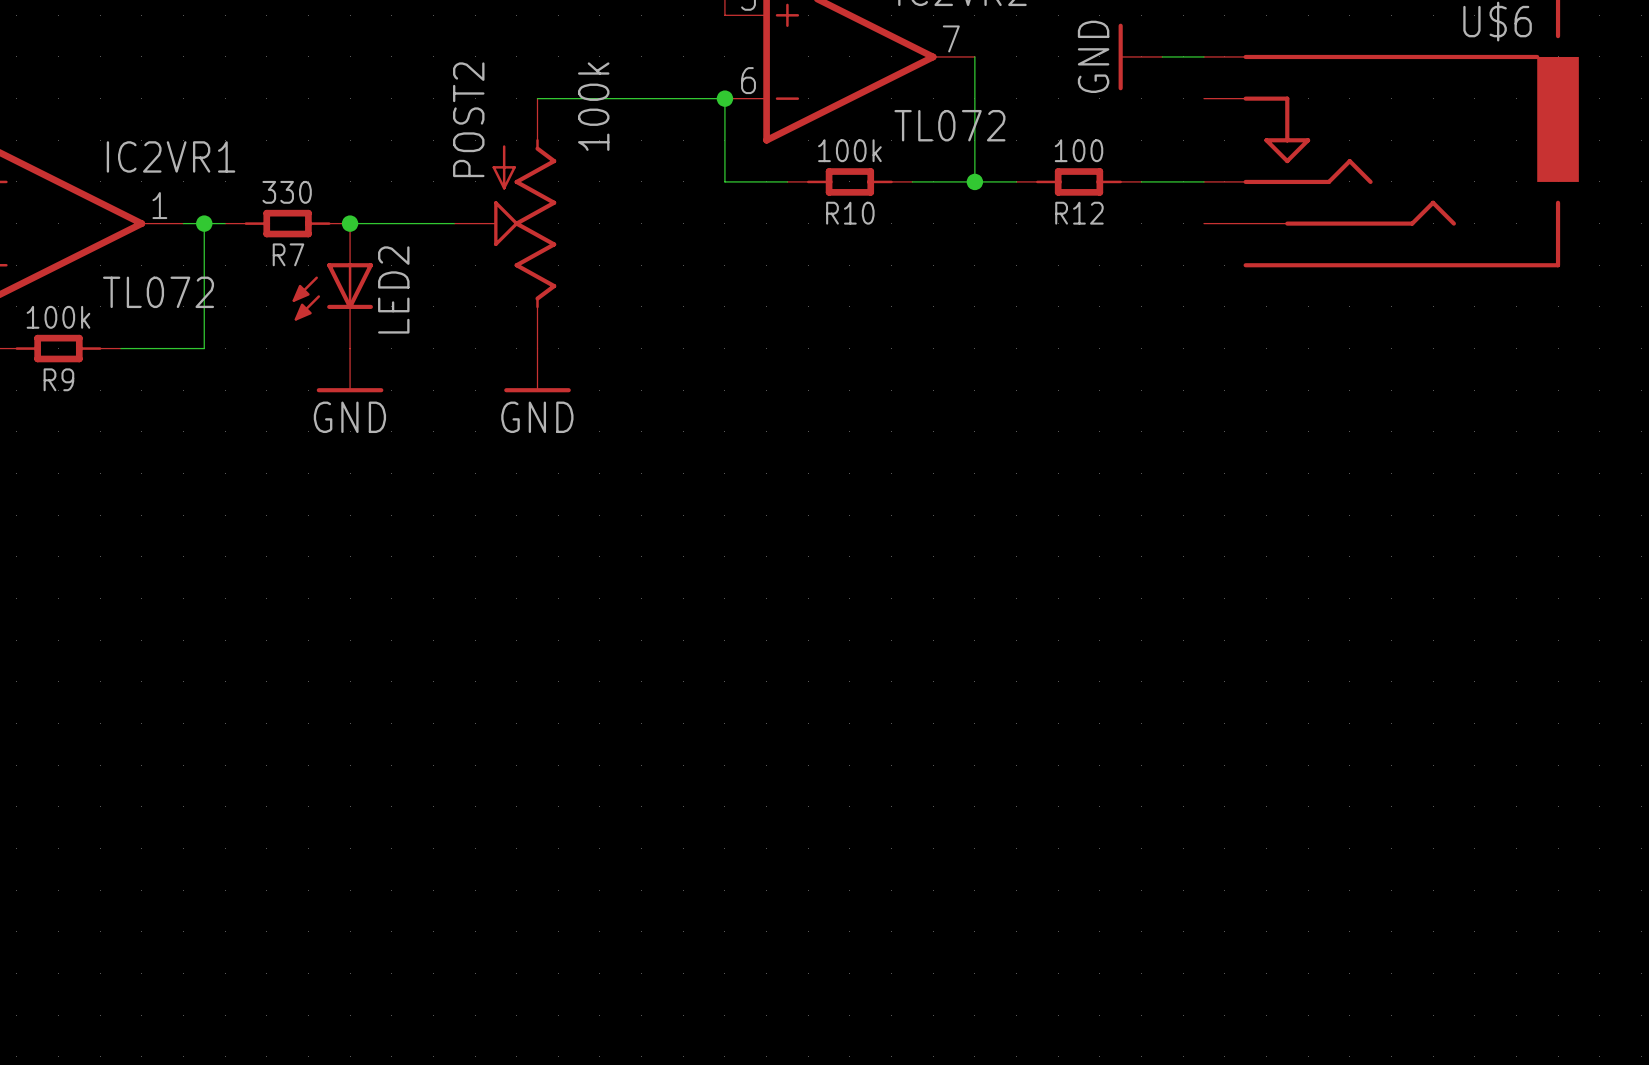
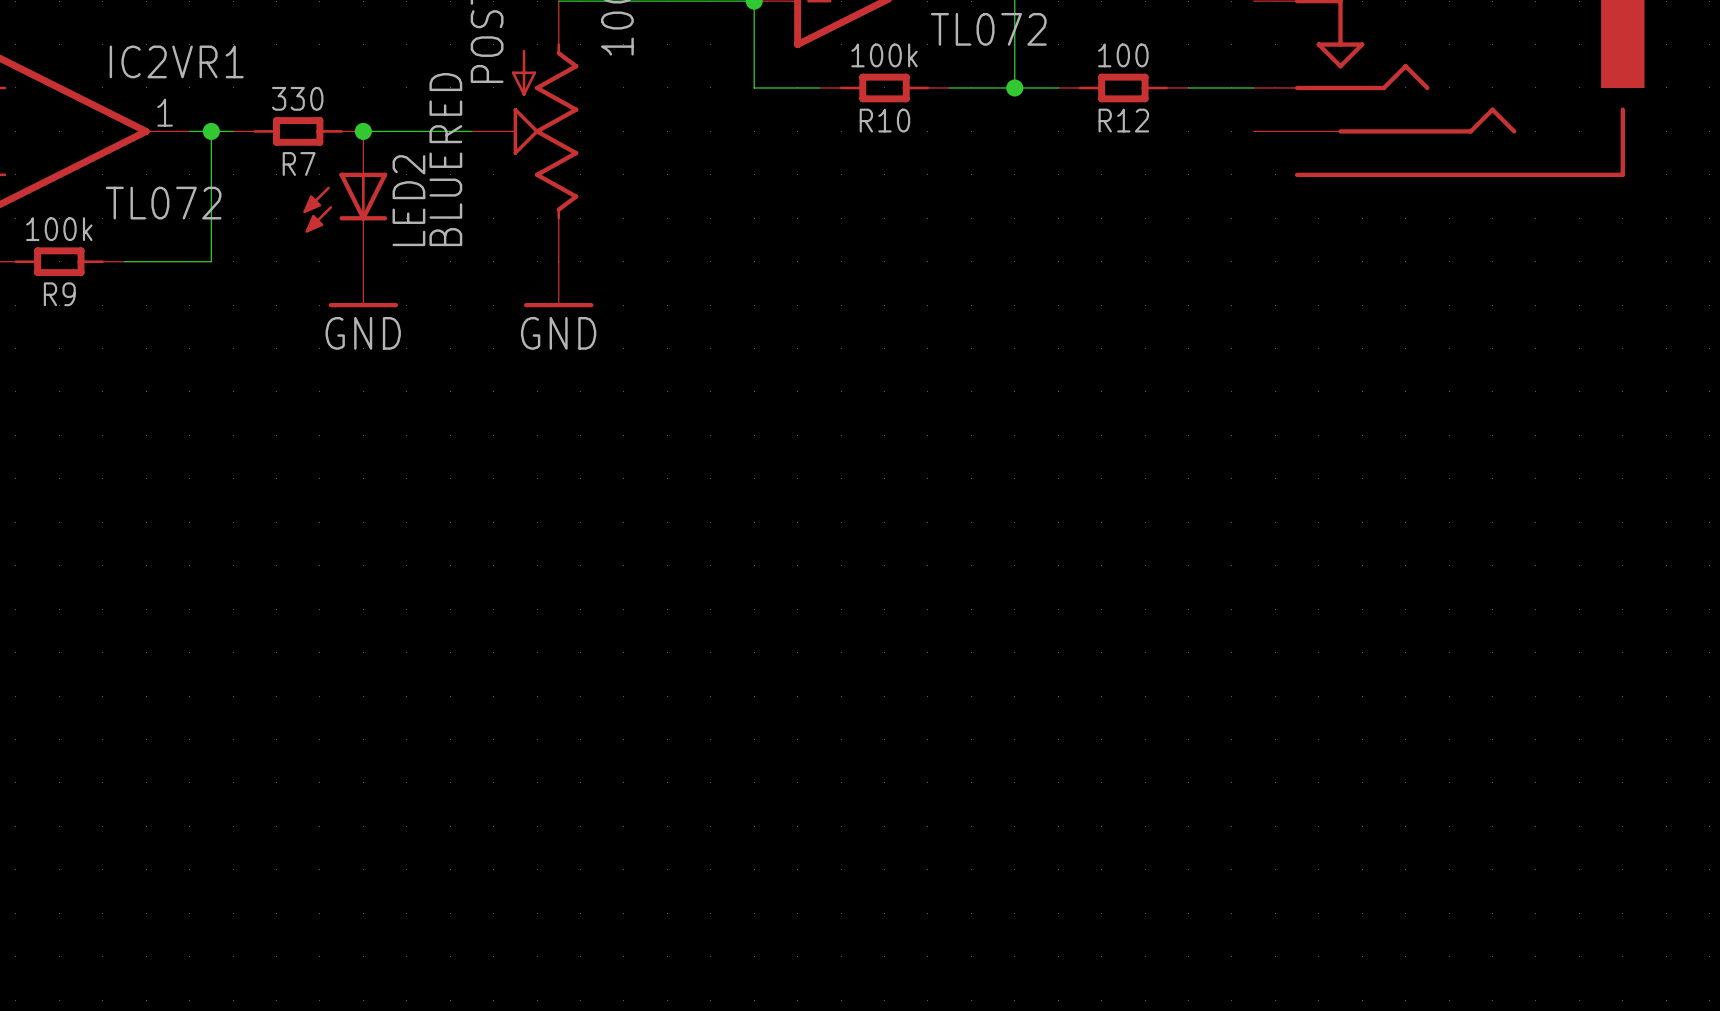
LED2 value: none -> BLUERED (445, 159)

